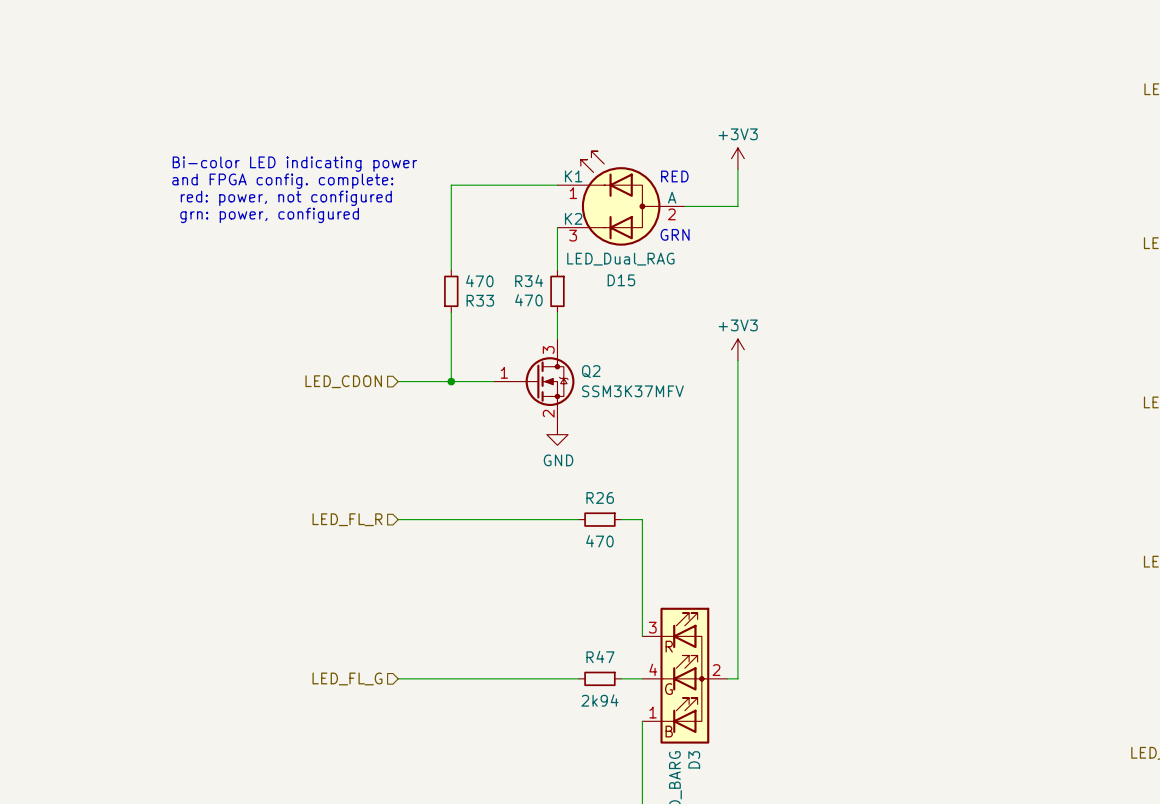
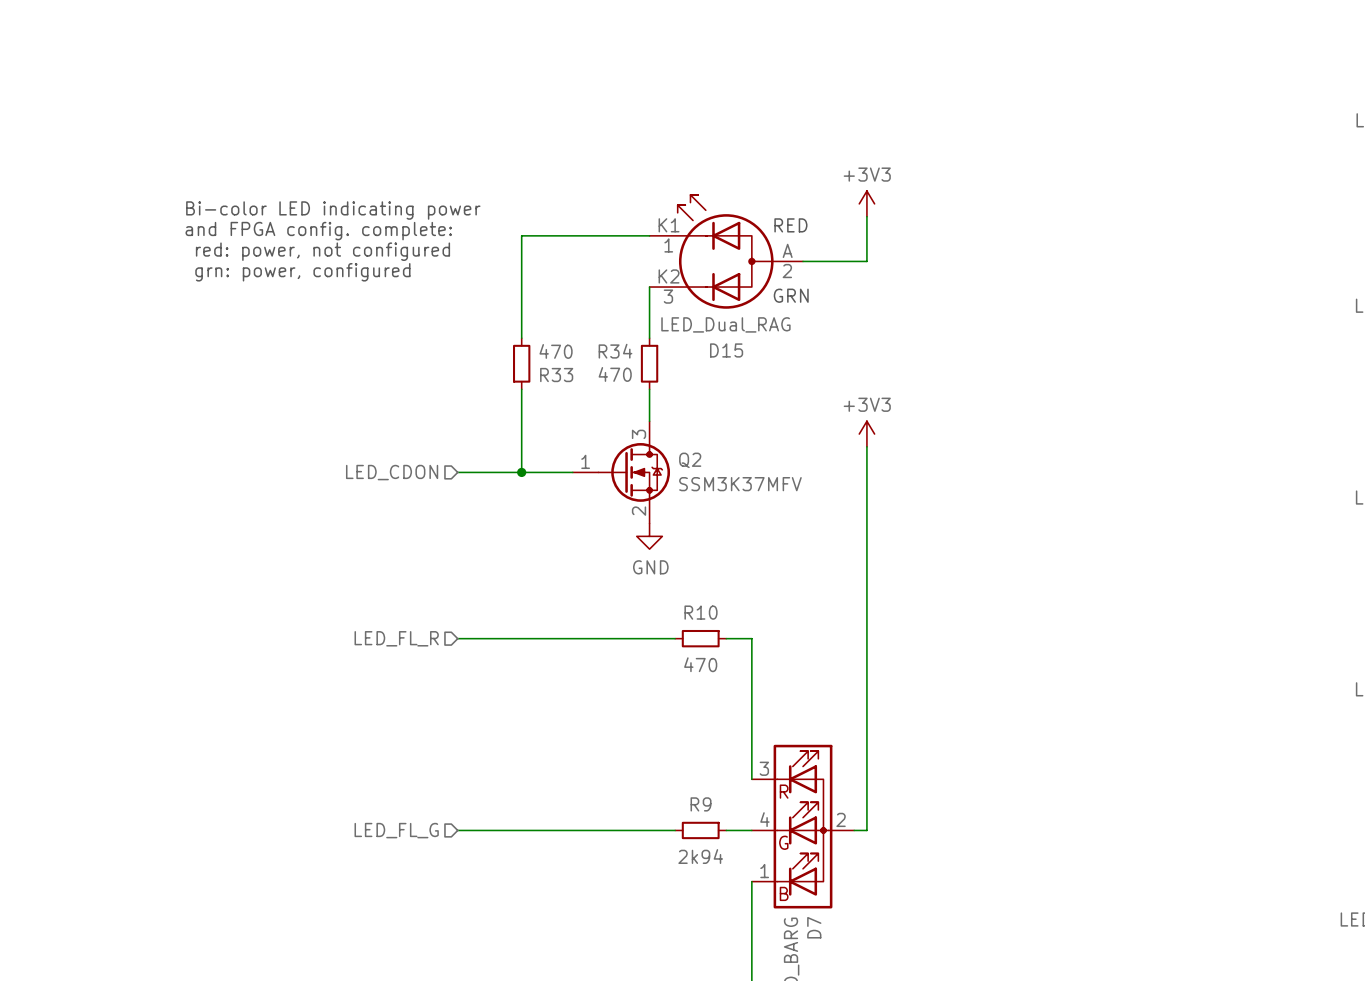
R26 name: R26 (600, 497) -> R10 (701, 612)
R47 name: R47 (600, 656) -> R9 (701, 804)
D3 name: D3 (694, 759) -> D7 (814, 927)

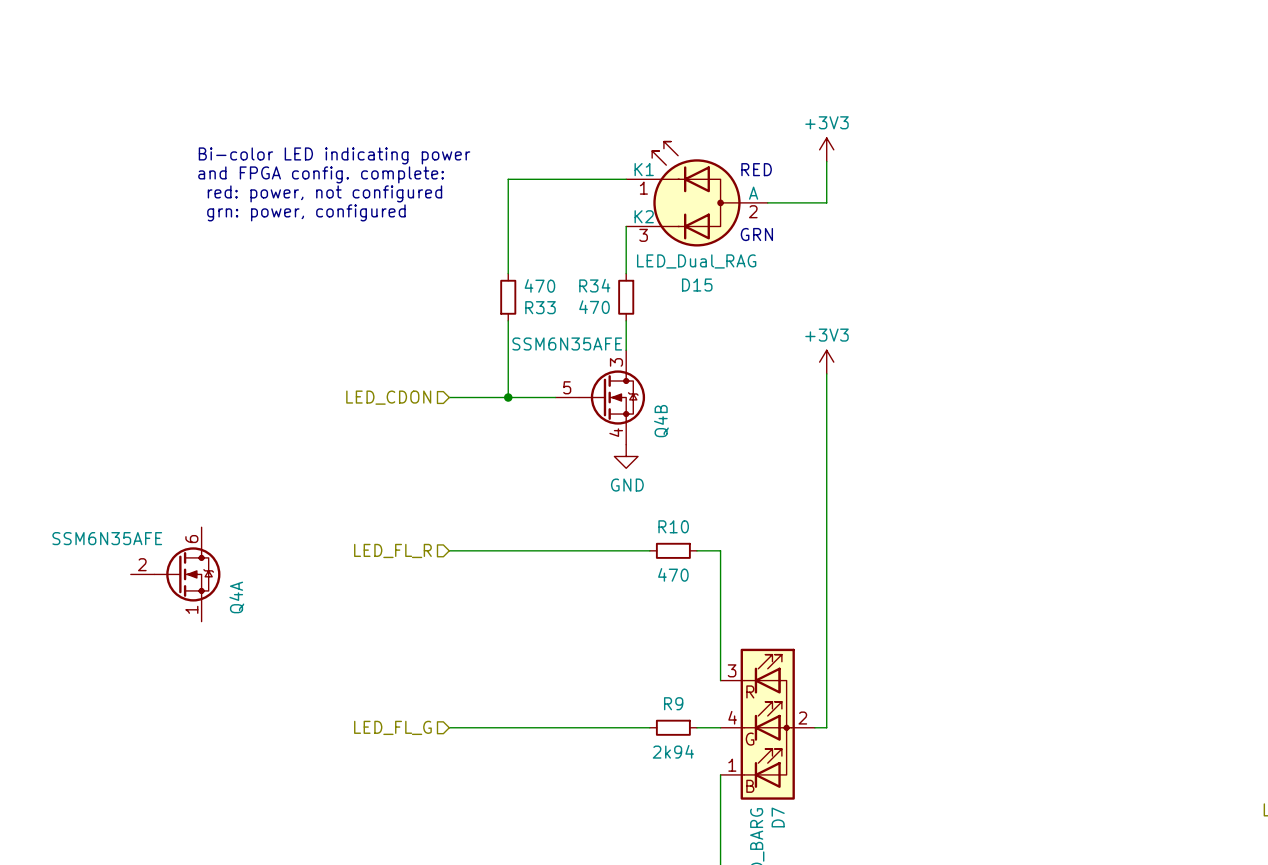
Q2 name: Q2 (690, 460) -> Q4B (661, 421)
Q2 pin number: 1 (585, 461) -> 5 (567, 387)
Q2 value: SSM3K37MFV (740, 484) -> SSM6N35AFE (567, 343)
Q2 pin number: 2 (639, 511) -> 4 (616, 432)
Q4A: none -> SSM6N35AFE (175, 574)

